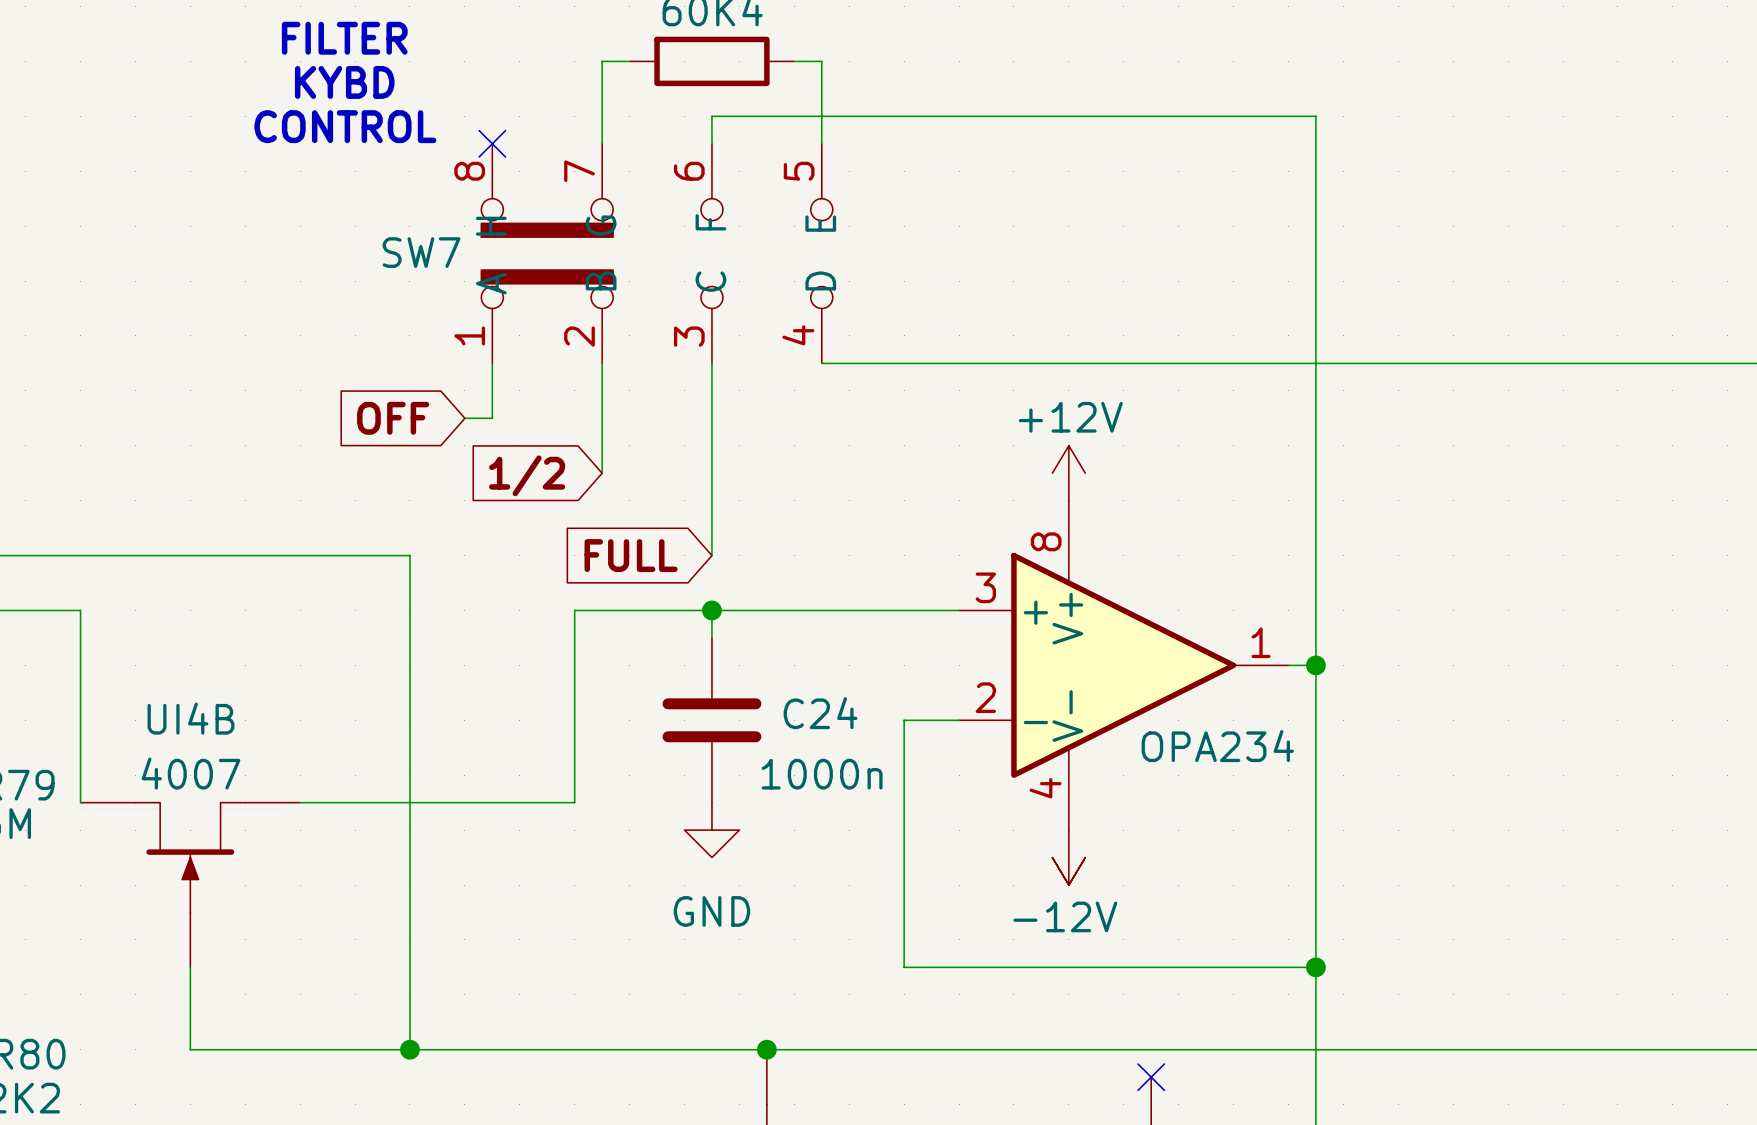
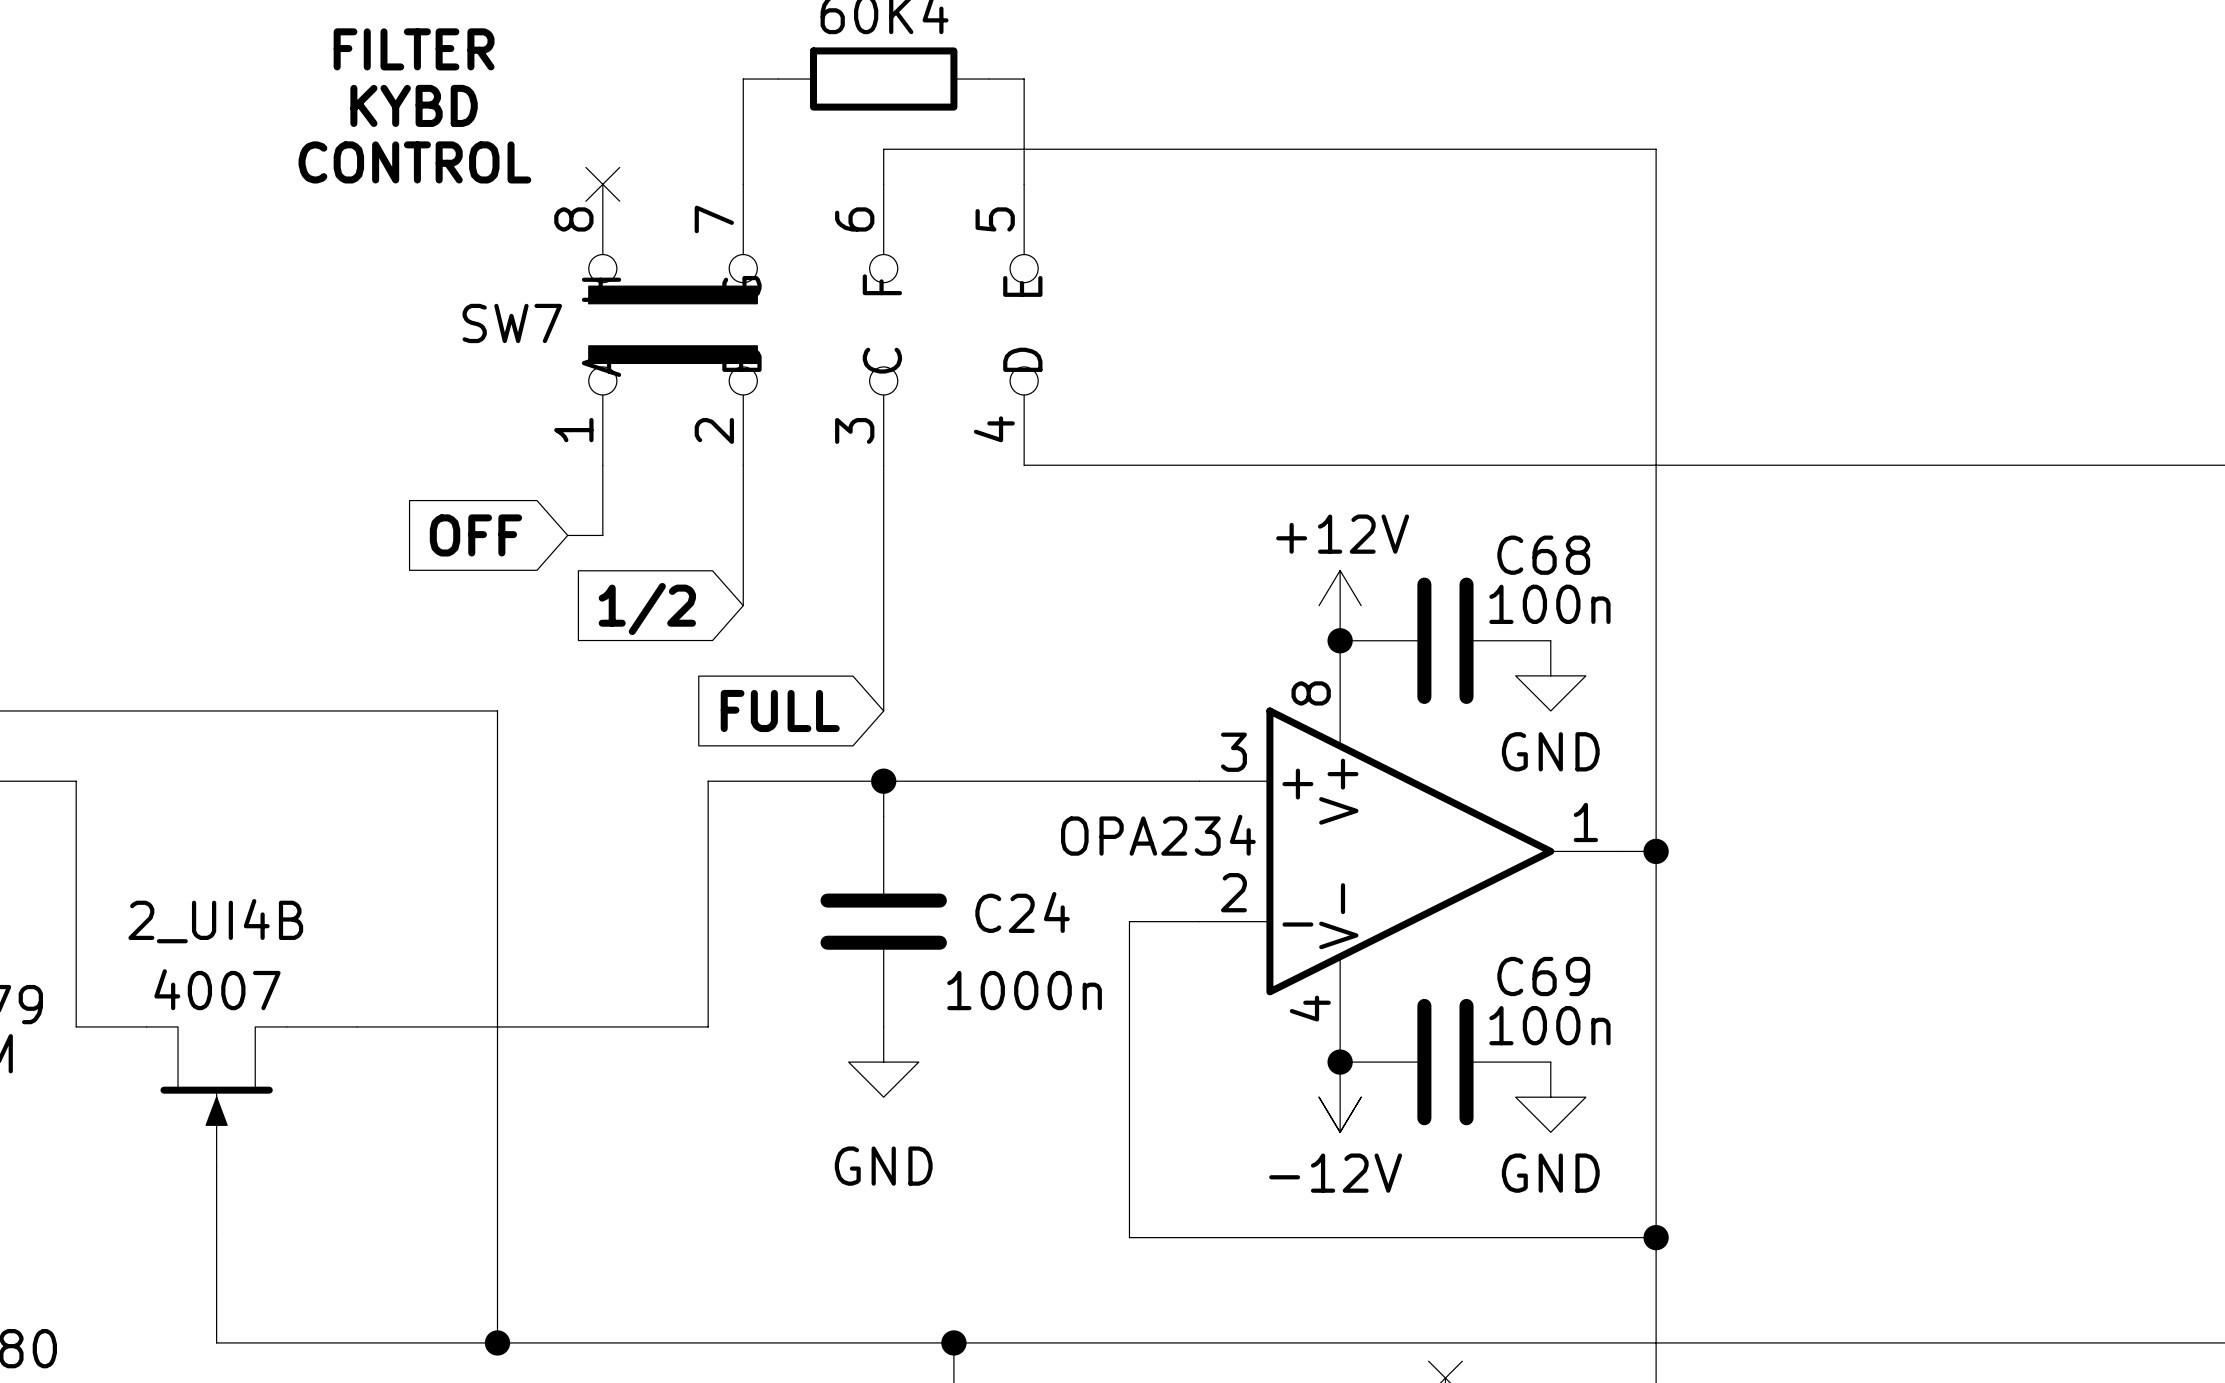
junction: none -> (1340, 640)
C68: none -> 100n (1445, 640)
power symbol: none -> GND (1550, 675)
UI4B name: UI4B (191, 718) -> 2_UI4B (215, 921)
part value position: OPA234 (1217, 746) -> OPA234 (1158, 835)
junction: none -> (1340, 1062)
C69: none -> 100n (1445, 1062)
power symbol: none -> GND (1550, 1097)

